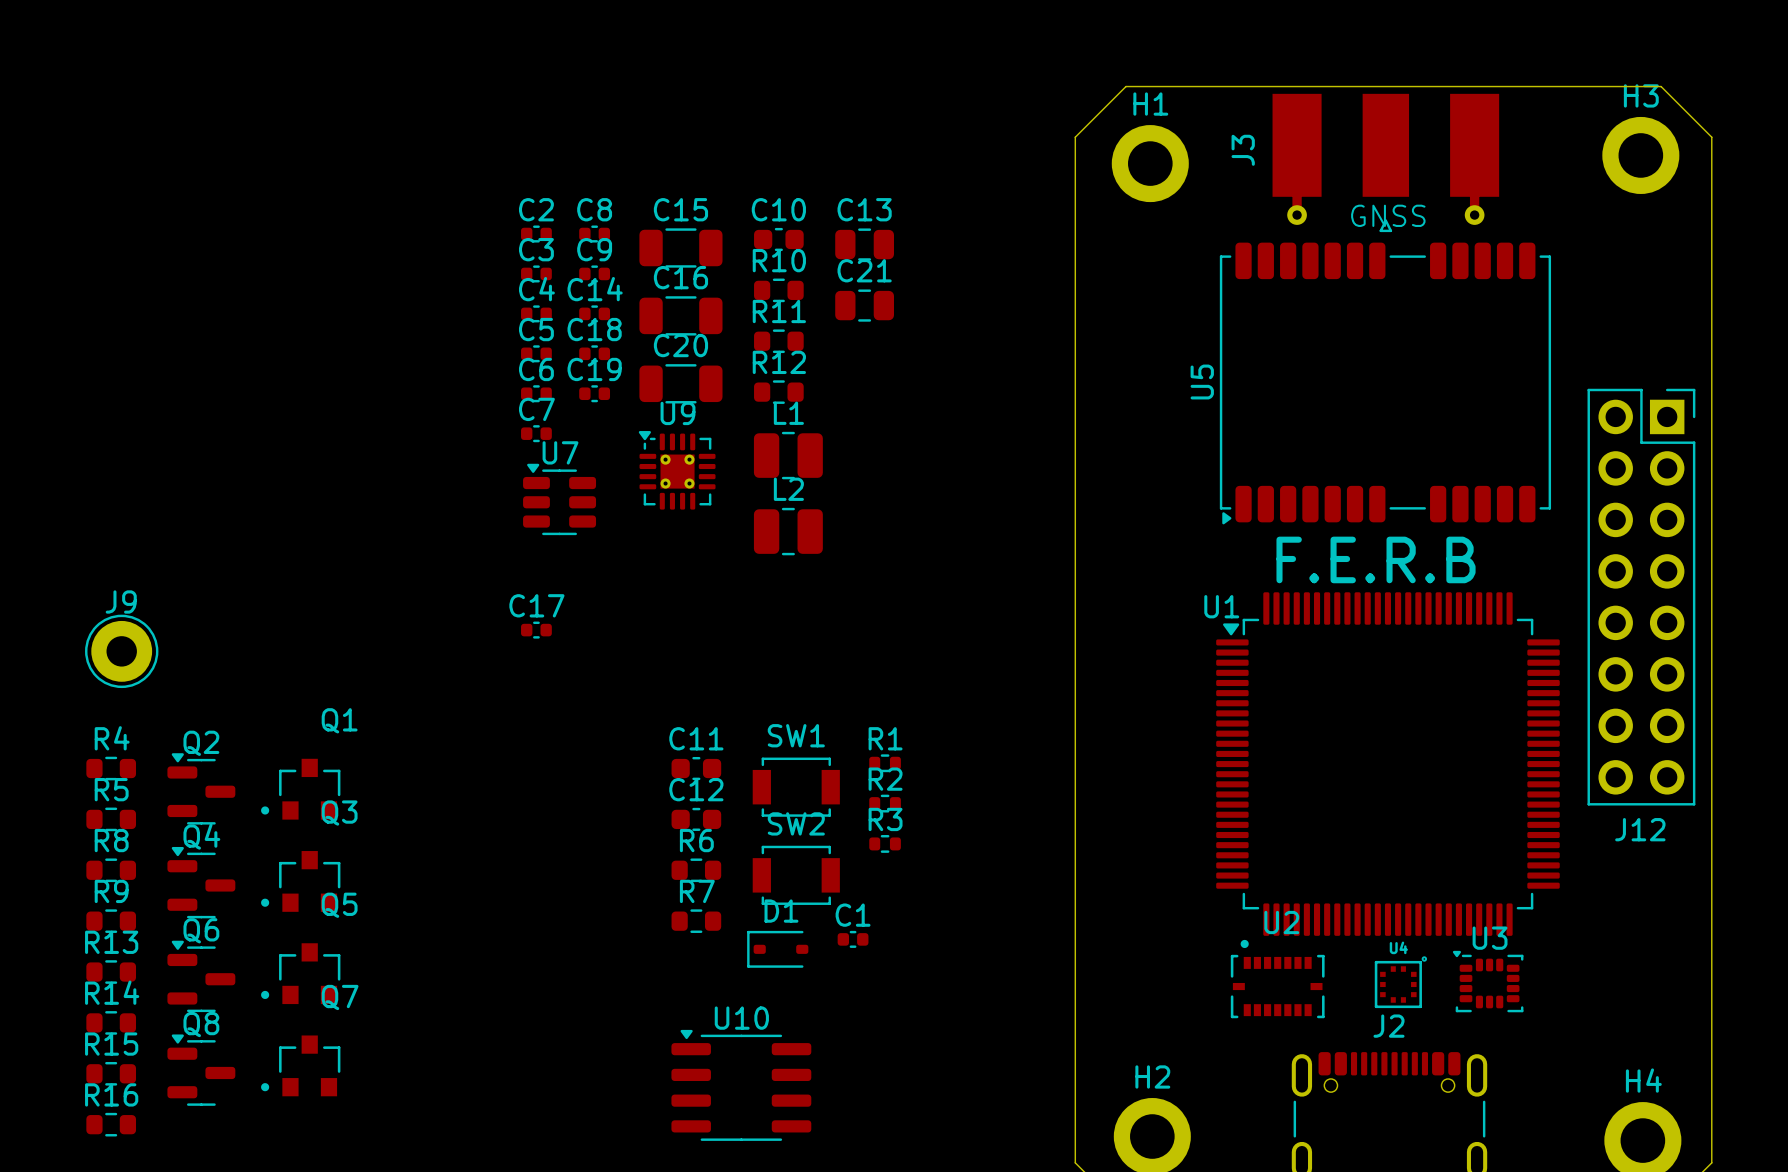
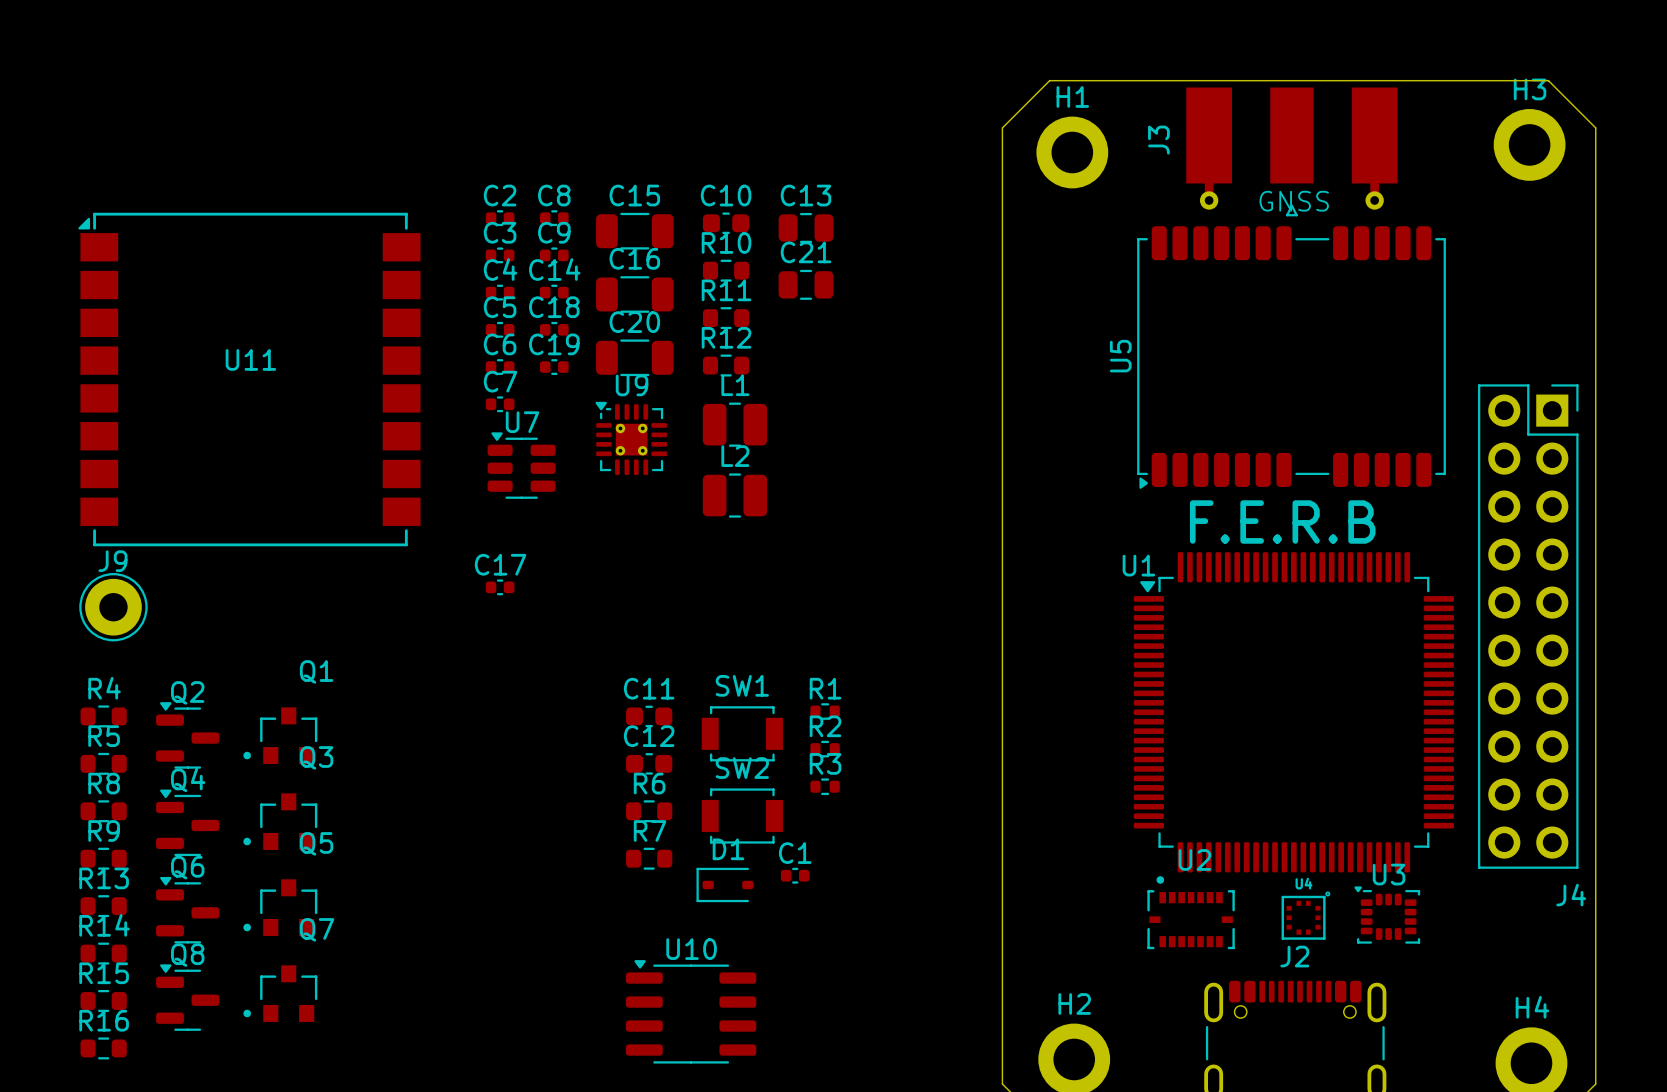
U11: none -> (249, 379)
J12: (1641, 597) -> none
J4: none -> (1528, 626)

